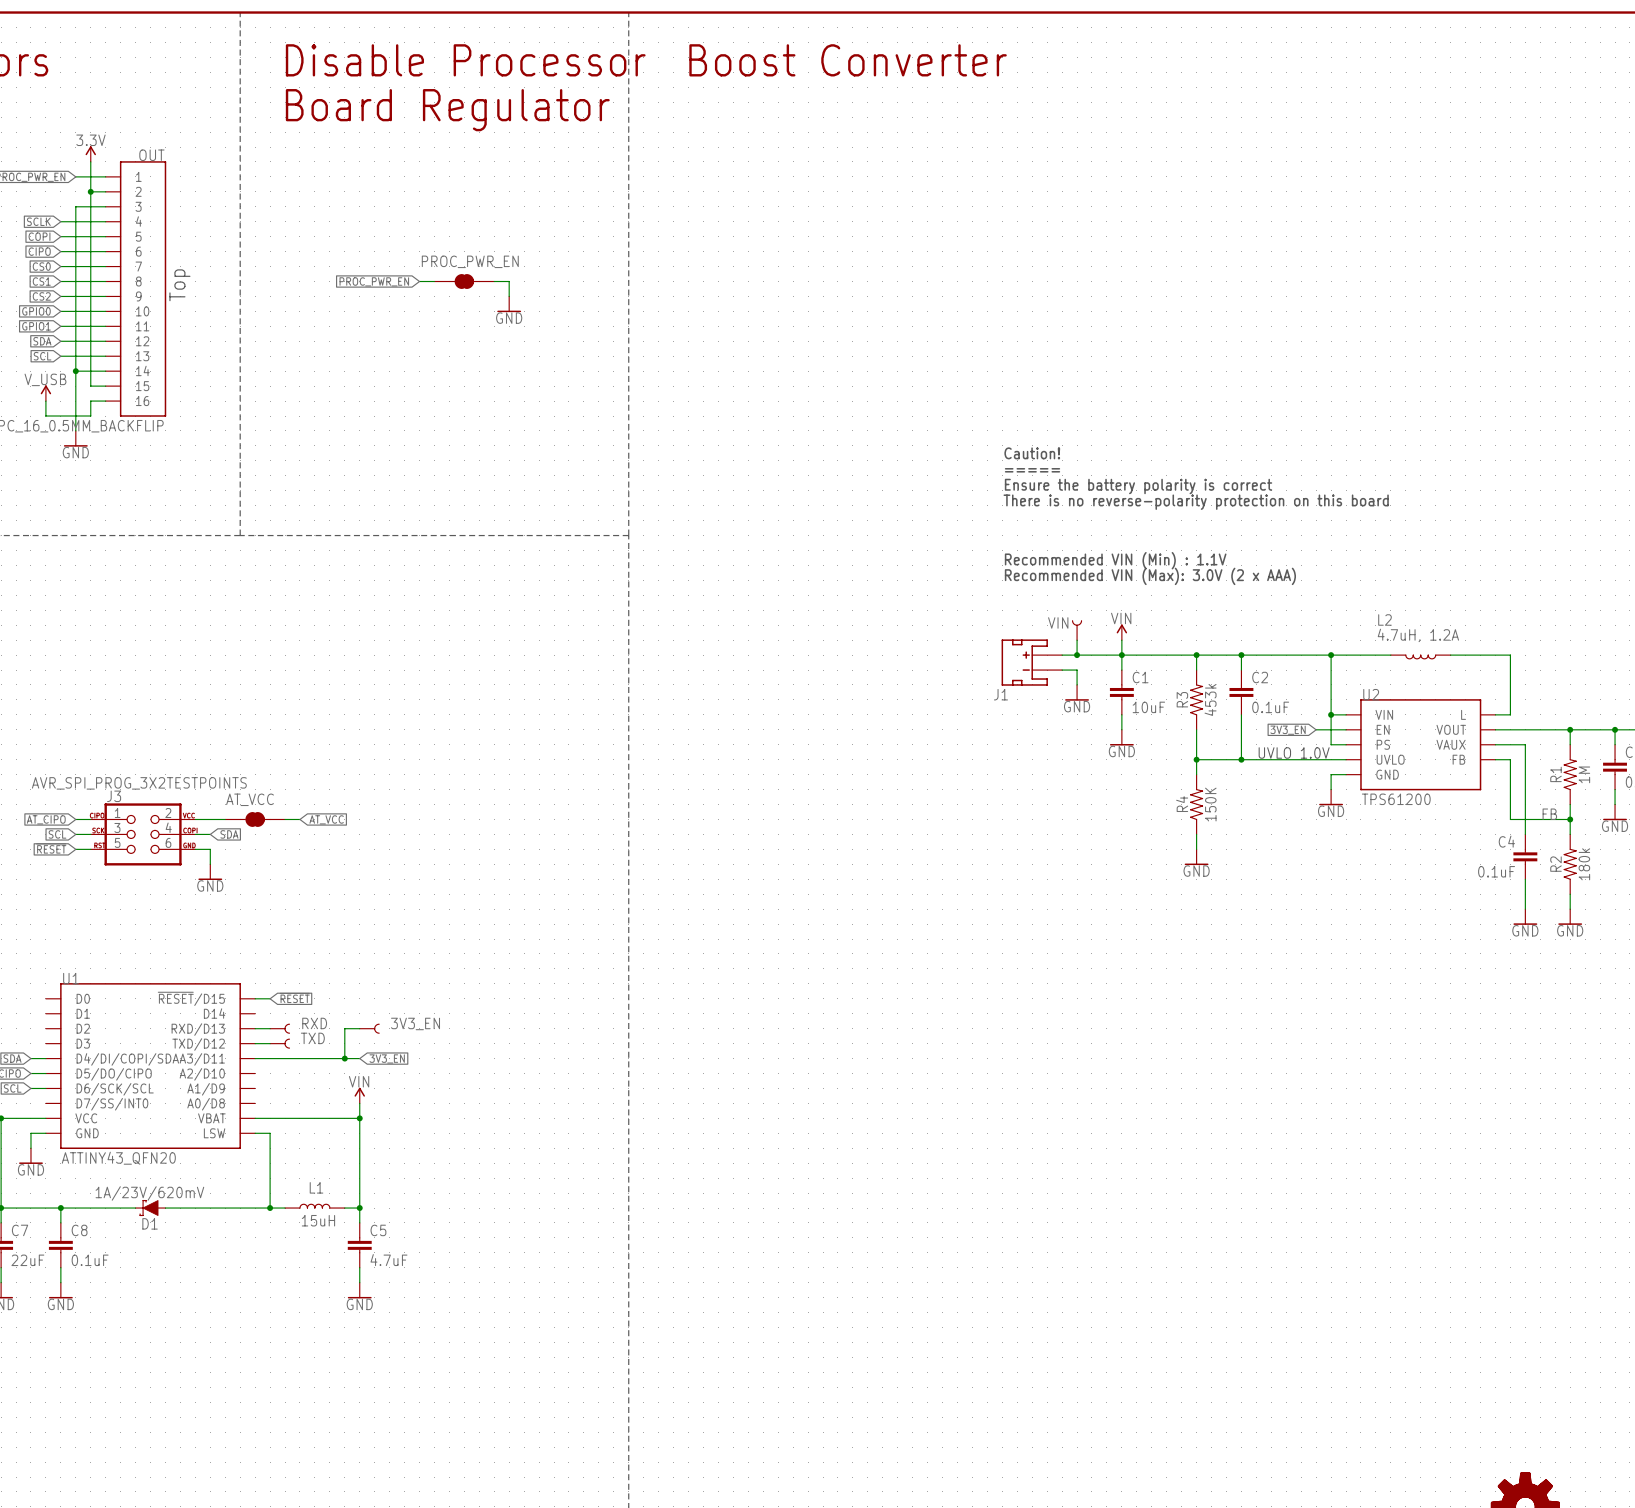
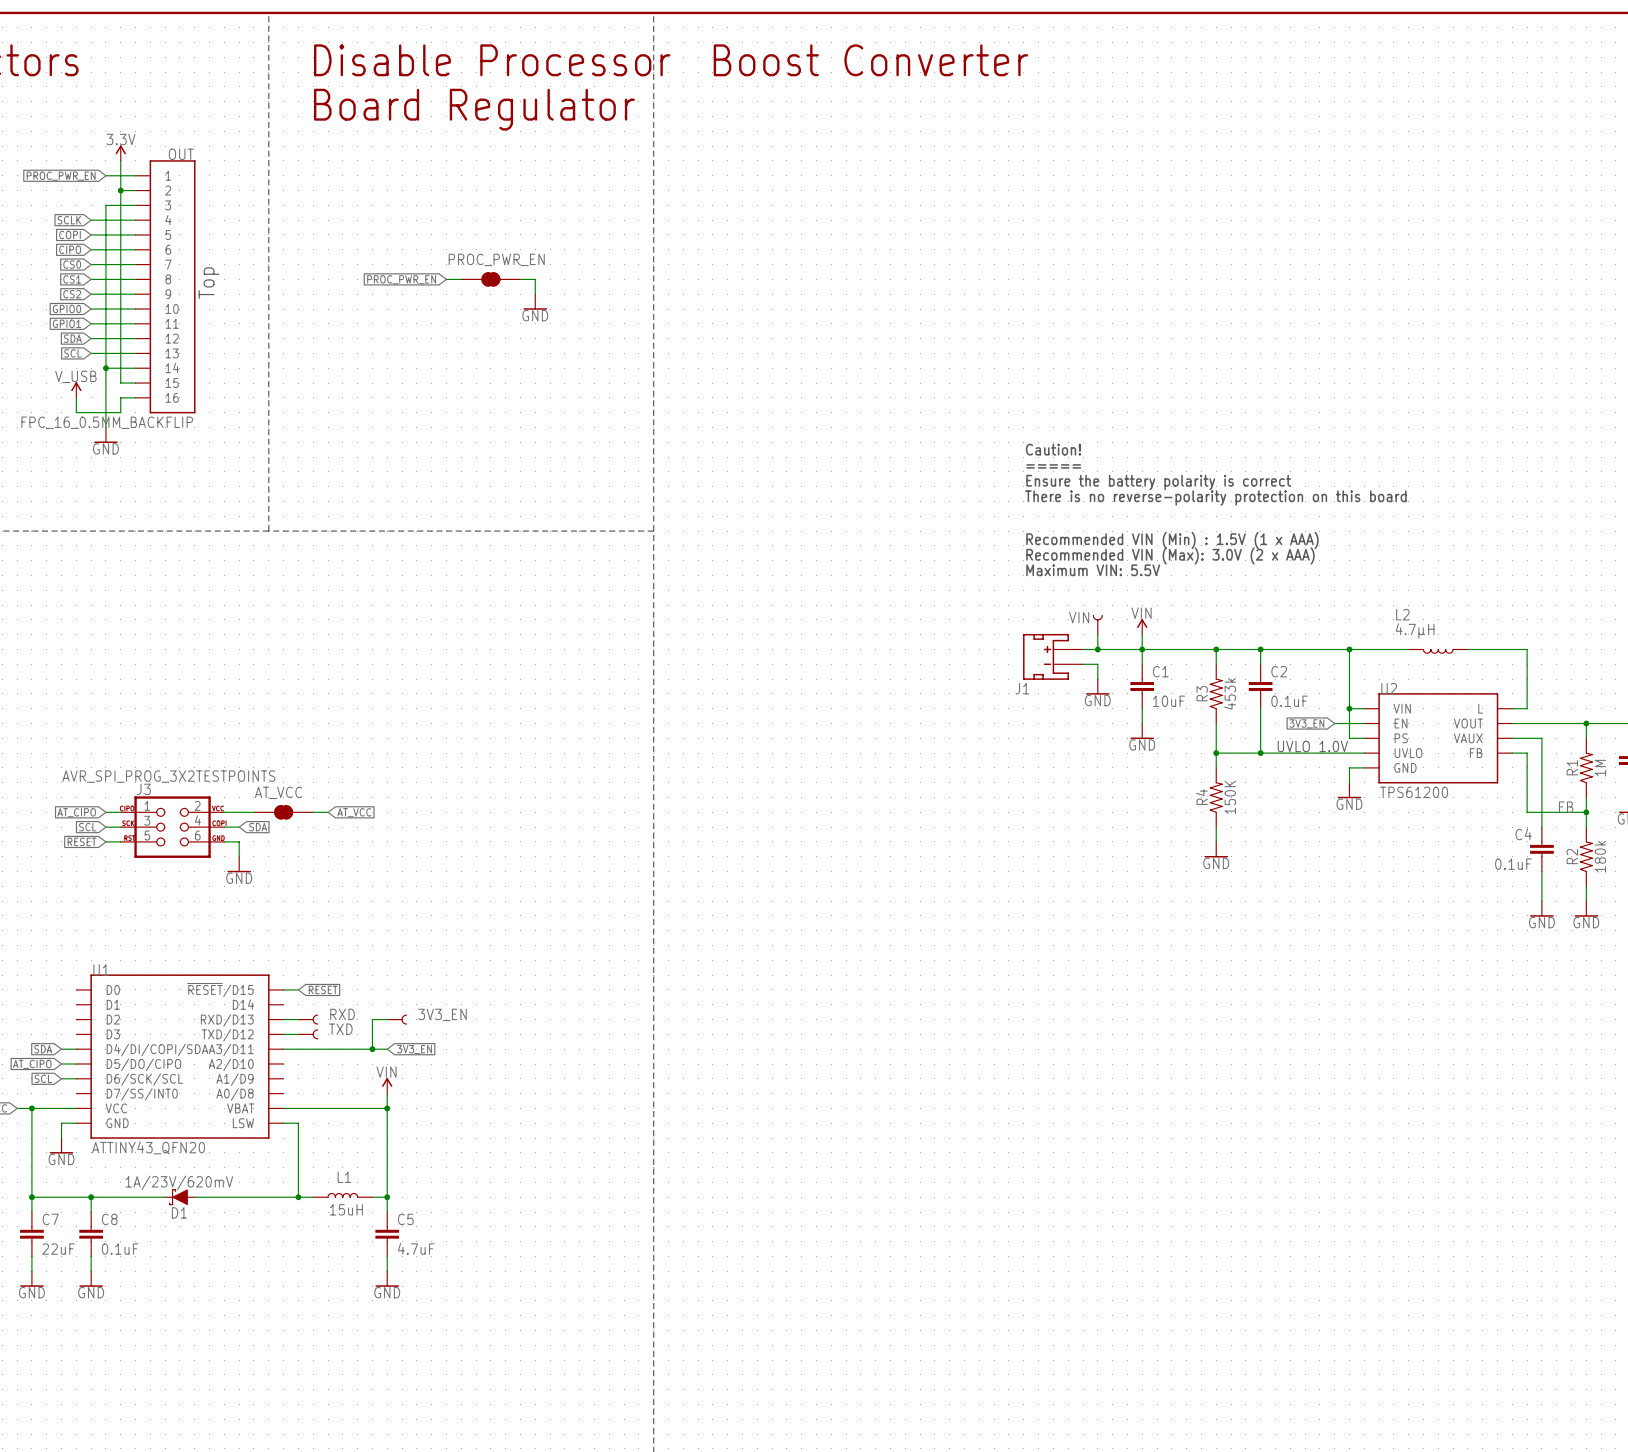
text: none -> Recommended VIN (Min) : 1.5V (1 x AAA) (1172, 540)
text: Recommended VIN (Min) : 1.1V (1115, 560) -> Recommended VIN (Max): 3.0V (2 x AAA) (1170, 555)
text: Recommended VIN (Max): 3.0V (2 x AAA) (1150, 576) -> Maximum VIN: 5.5V (1093, 570)
L2 value: 4.7uH, 1.2A (1418, 635) -> 4.7μH (1415, 630)

